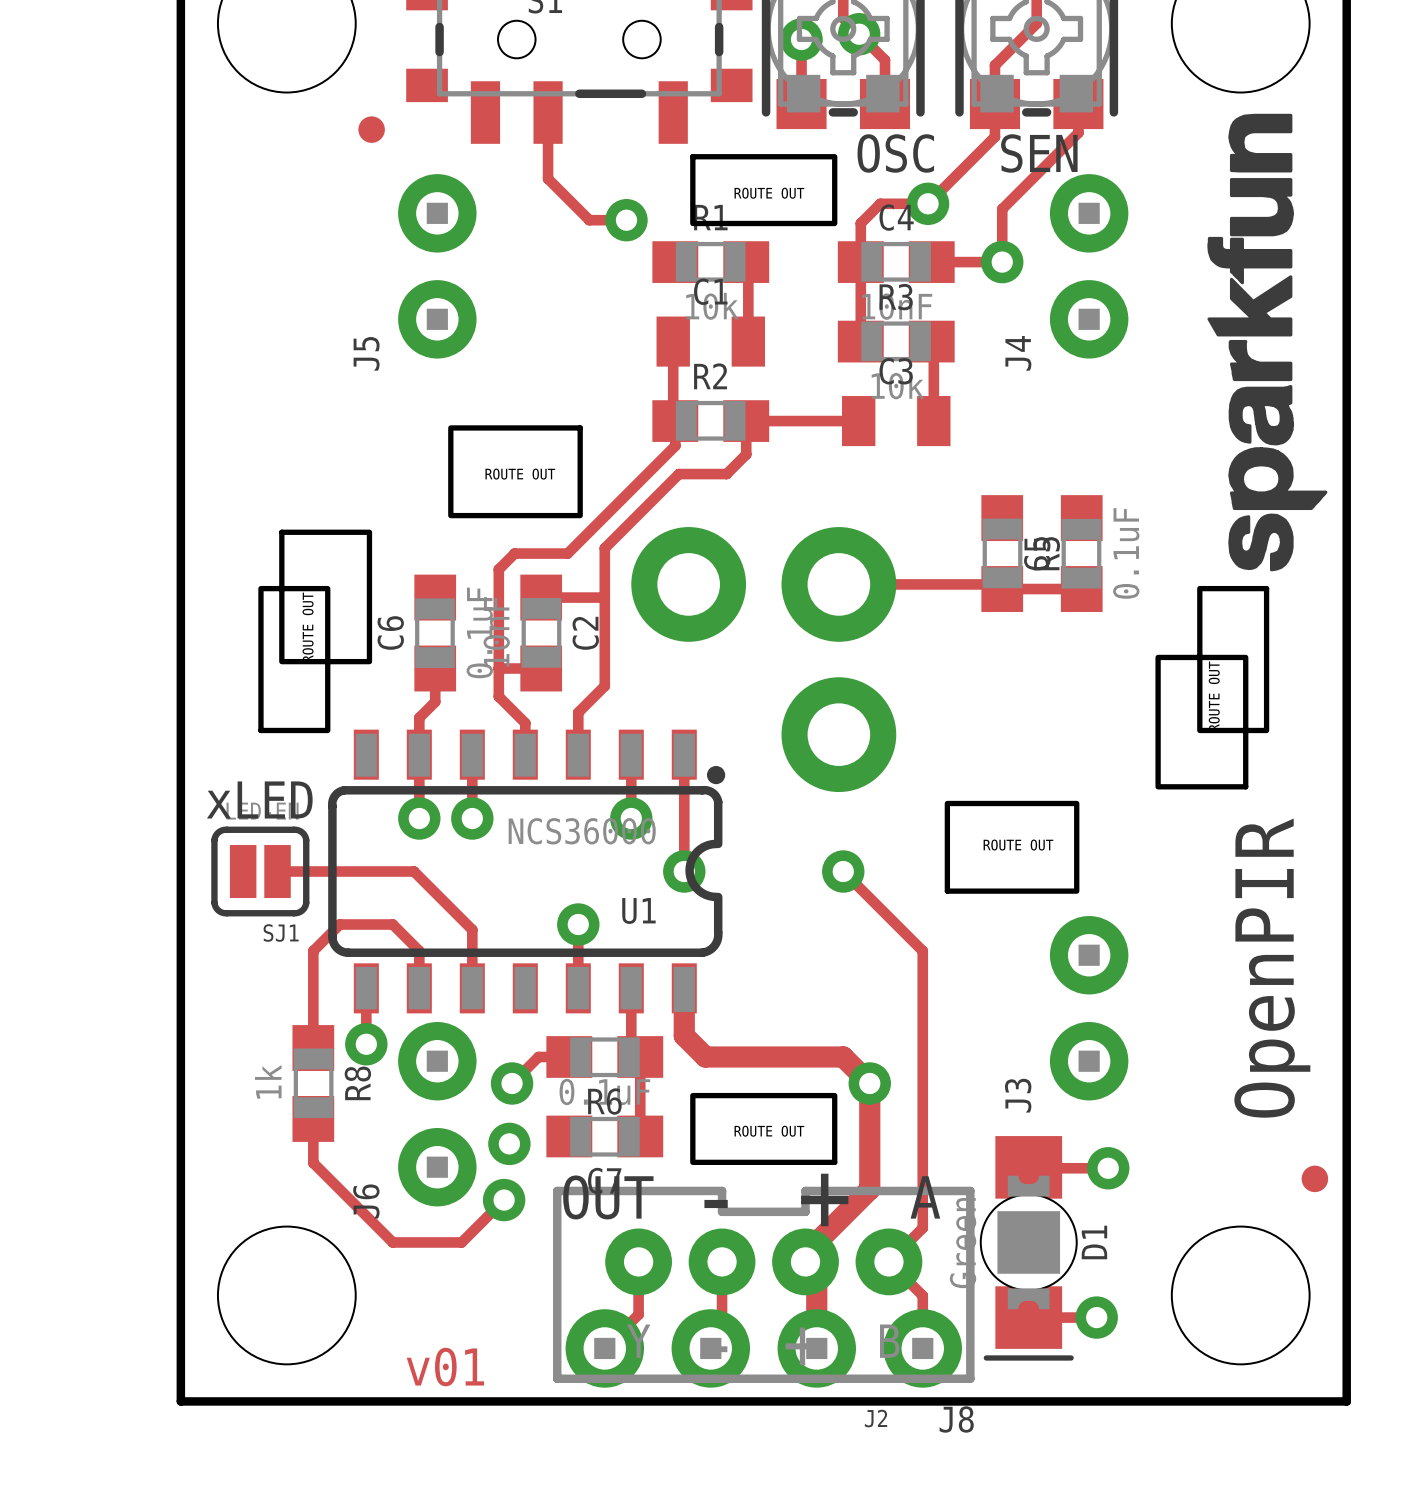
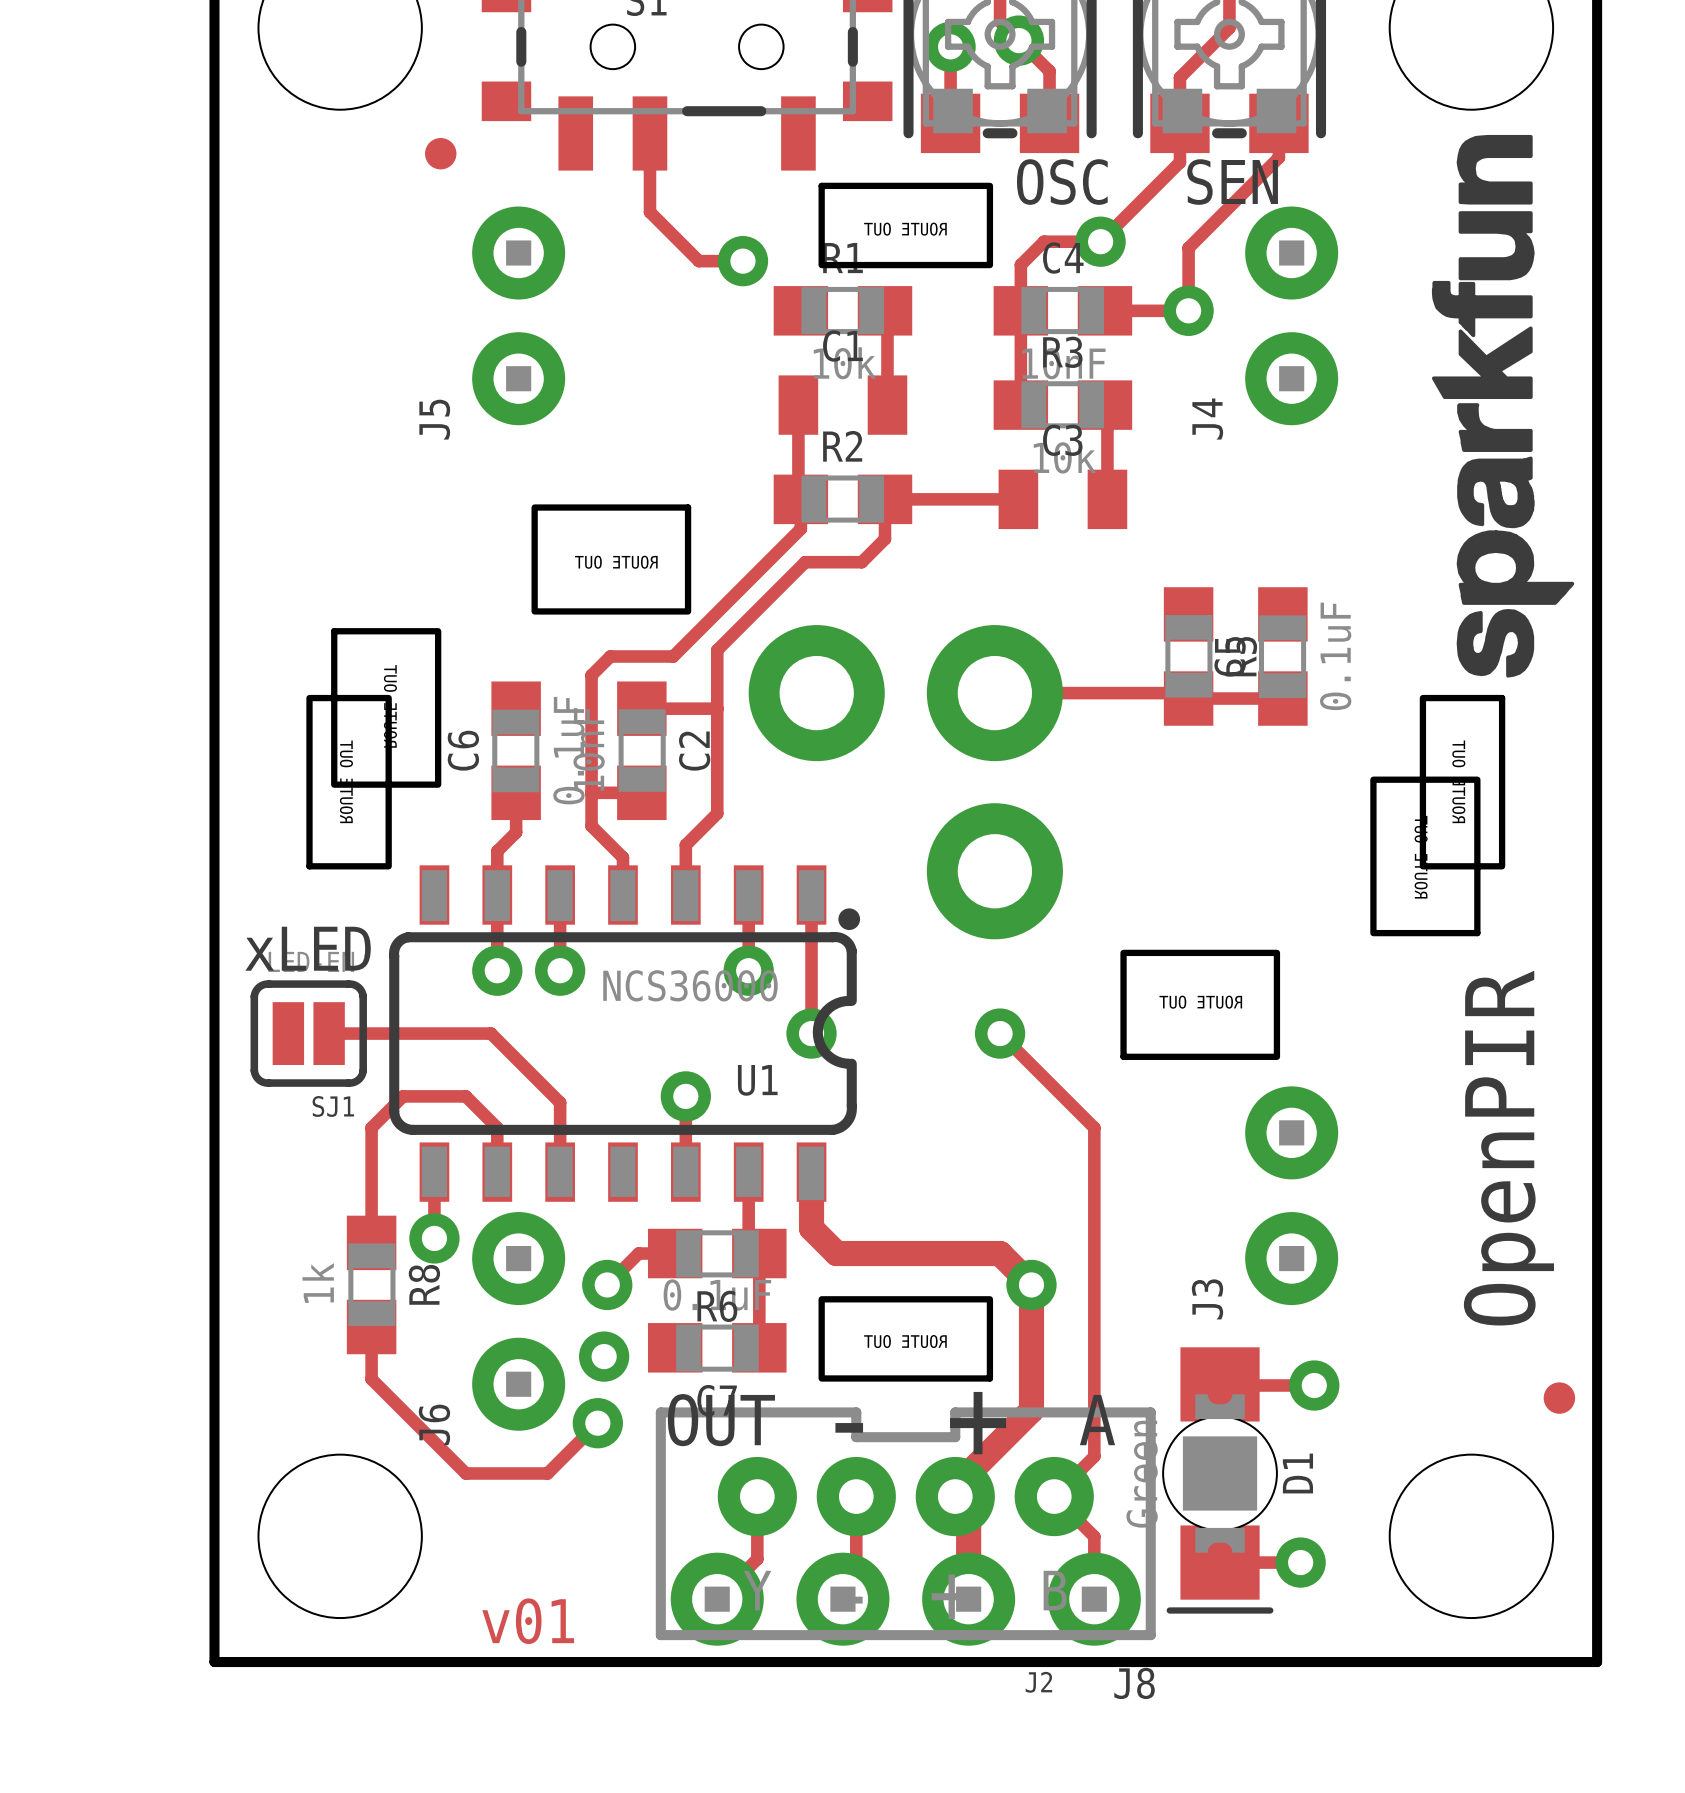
drawing: [258, 154, 1270, 1166] -> none
drawing: none -> [306, 182, 1506, 1382]
text: ROUTE OUT (769, 193) -> none
text: ROUTE OUT (520, 474) -> none
text: ROUTE OUT (308, 627) -> none
text: ROUTE OUT (1214, 696) -> none
text: ROUTE OUT (1018, 845) -> none
text: ROUTE OUT (769, 1131) -> none

